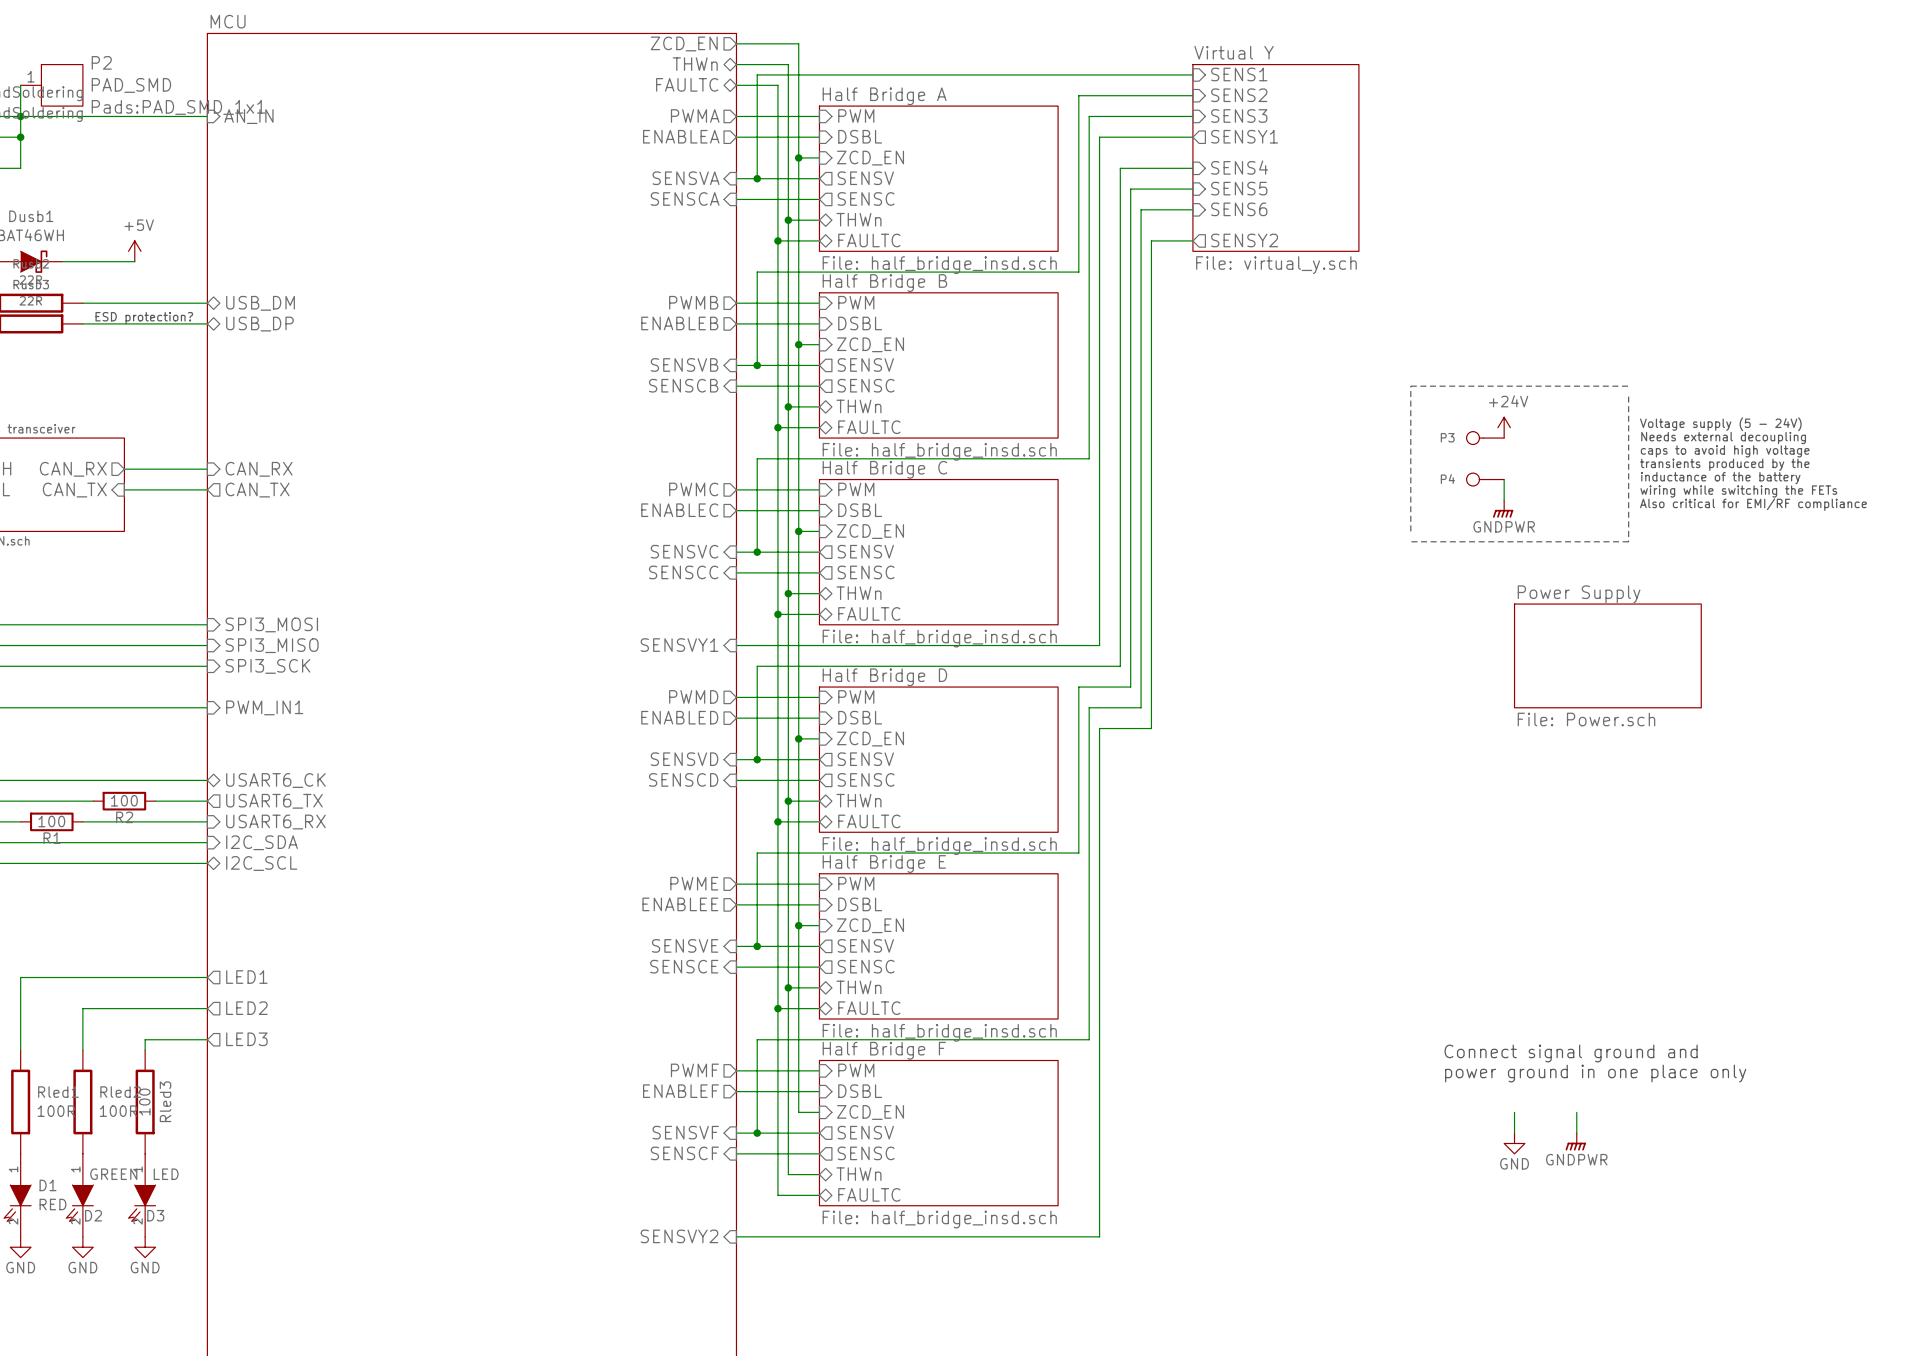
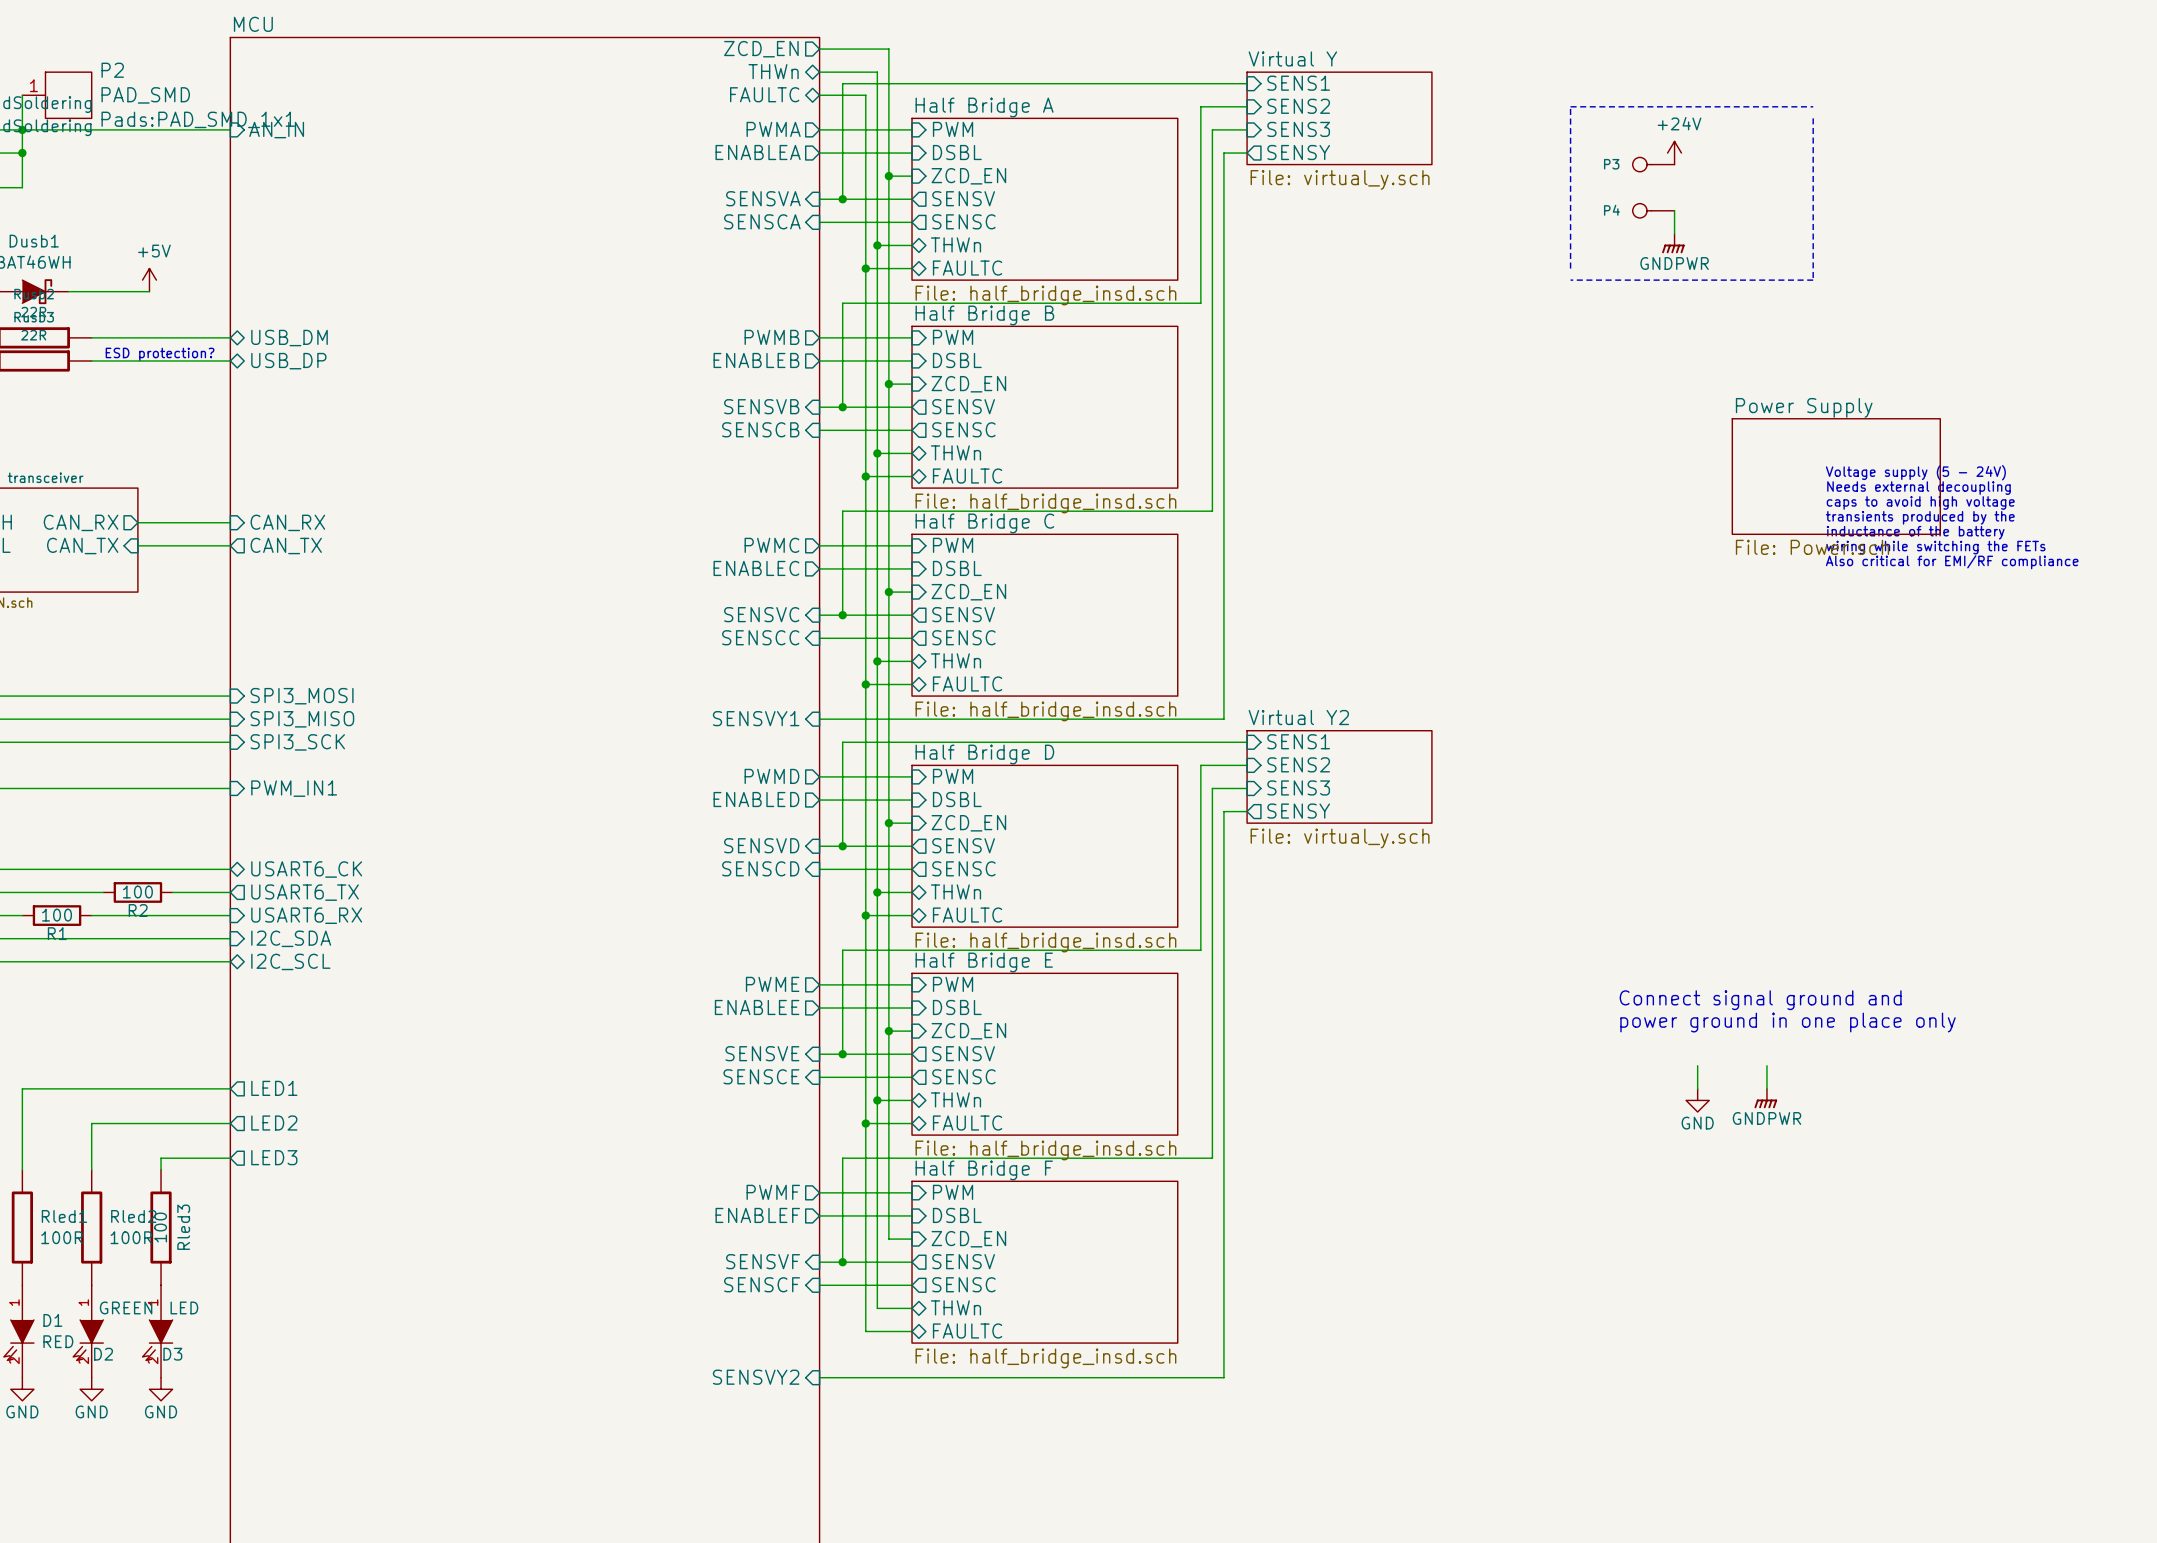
wire: (1120, 74) (1192, 74) -> none
sheet pin position: SENS1 (1239, 74) -> SENS1 (1298, 83)
wire: (1120, 95) (1192, 95) -> none
sheet pin position: SENS2 (1239, 95) -> SENS2 (1298, 106)
line: none -> (1813, 106) (1570, 106) (1570, 268)
sheet Virtual Y: none -> File: virtual_y.sch (1339, 118)
line: none -> (1813, 118) (1813, 280) (1570, 280)
sheet pin position: SENS3 (1239, 115) -> SENS3 (1298, 129)
wire: (1120, 116) (1192, 116) -> none
sheet pin: none -> SENSY (1298, 152)
sheet pin: SENSY1 (1244, 136) -> none
wire: (1120, 137) (1192, 137) -> none
power symbol: none -> +24V (1674, 153)
sheet Virtual Y: File: virtual_y.sch (1275, 157) -> none
sheet pin: SENS4 (1239, 167) -> none
wire: (1192, 168) (1120, 168) (1120, 666) -> none
sheet pin: SENS5 (1239, 188) -> none
wire: (1192, 189) (1130, 189) (1130, 687) (1120, 687) -> none
wire: none -> (1674, 210) (1674, 233)
wire: (1192, 209) (1141, 209) (1141, 707) (1120, 707) -> none
sheet pin: SENS6 (1239, 209) -> none
power symbol: none -> GNDPWR (1673, 243)
wire: (1192, 240) (1151, 240) (1151, 728) (1120, 728) -> none
sheet pin: SENSY2 (1244, 240) -> none
line: (1628, 386) (1410, 386) (1410, 531) -> none
line: (1628, 396) (1628, 541) (1410, 541) -> none
power symbol: +24V (1504, 427) -> none
sheet Power Supply: none -> File: Power.sch (1836, 476)
P3 position: (1485, 438) -> (1653, 164)
P4 position: (1485, 479) -> (1653, 210)
wire: (1504, 479) (1504, 500) -> none
power symbol: GNDPWR (1503, 509) -> none
sheet Power Supply: File: Power.sch (1607, 655) -> none
sheet pin: none -> SENS1 (1298, 741)
sheet pin: none -> SENS2 (1298, 764)
sheet Virtual Y2: none -> File: virtual_y.sch (1339, 776)
sheet pin: none -> SENS3 (1298, 787)
sheet pin: none -> SENSY (1298, 811)
text position: Connect signal ground and (1571, 1053) -> Connect signal ground and (1760, 1000)
text position: power ground in one place only (1595, 1073) -> power ground in one place only (1788, 1022)
wire: (1514, 1112) (1514, 1133) -> (1697, 1065) (1697, 1088)
wire: (1576, 1112) (1576, 1133) -> (1766, 1065) (1766, 1088)
power symbol position: GNDPWR (1575, 1141) -> GNDPWR (1765, 1098)
power symbol position: GND (1514, 1143) -> GND (1697, 1100)

